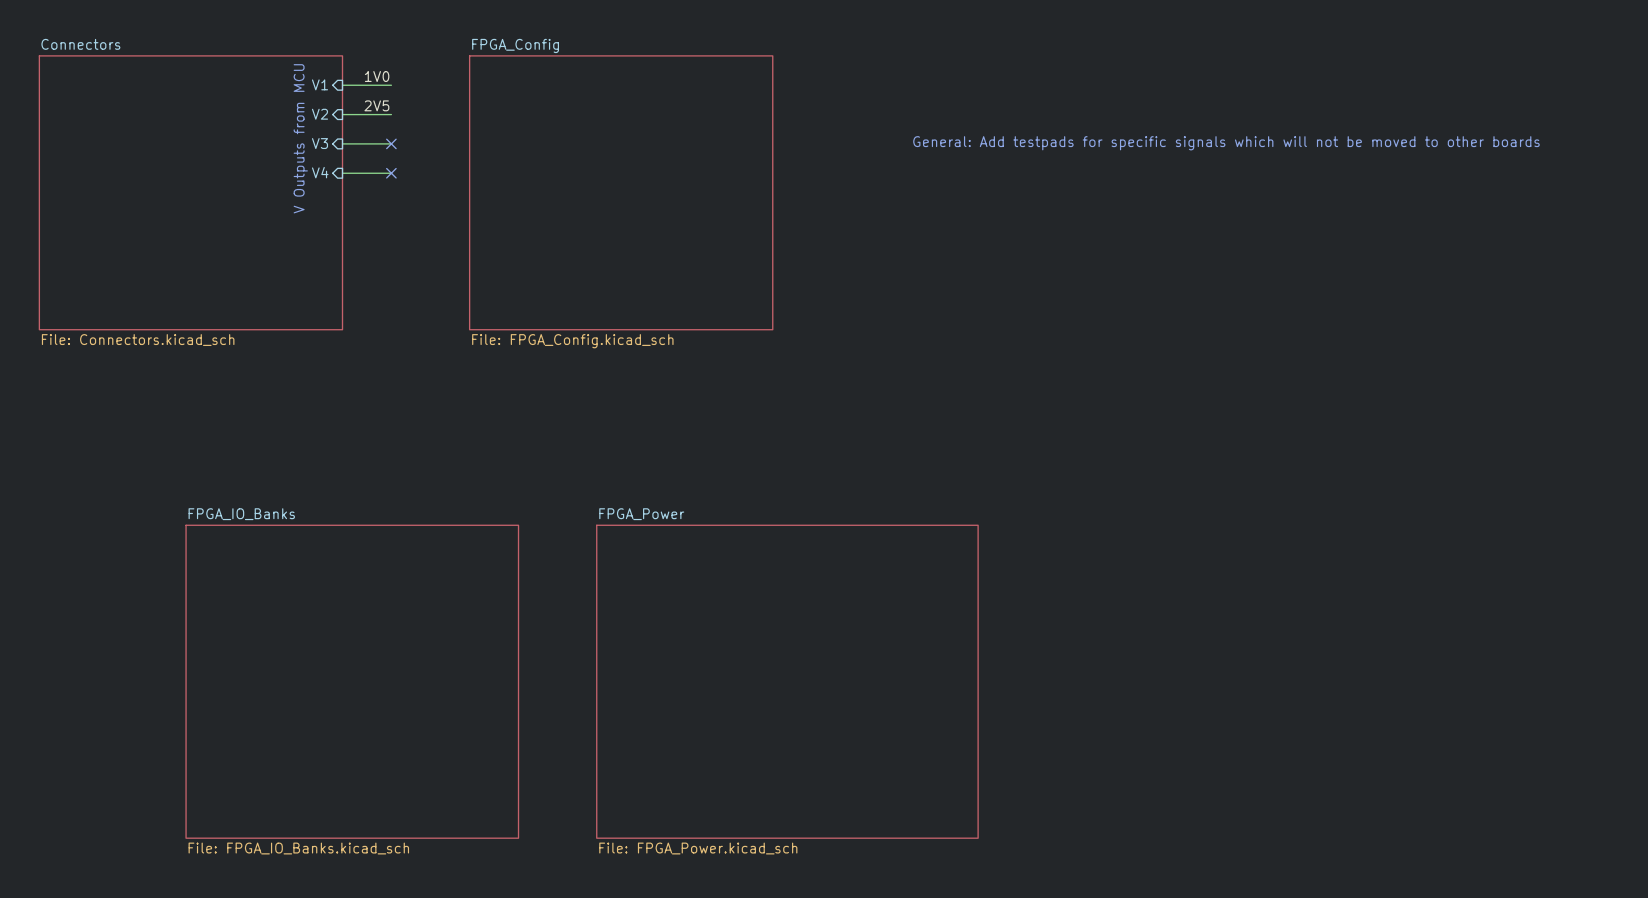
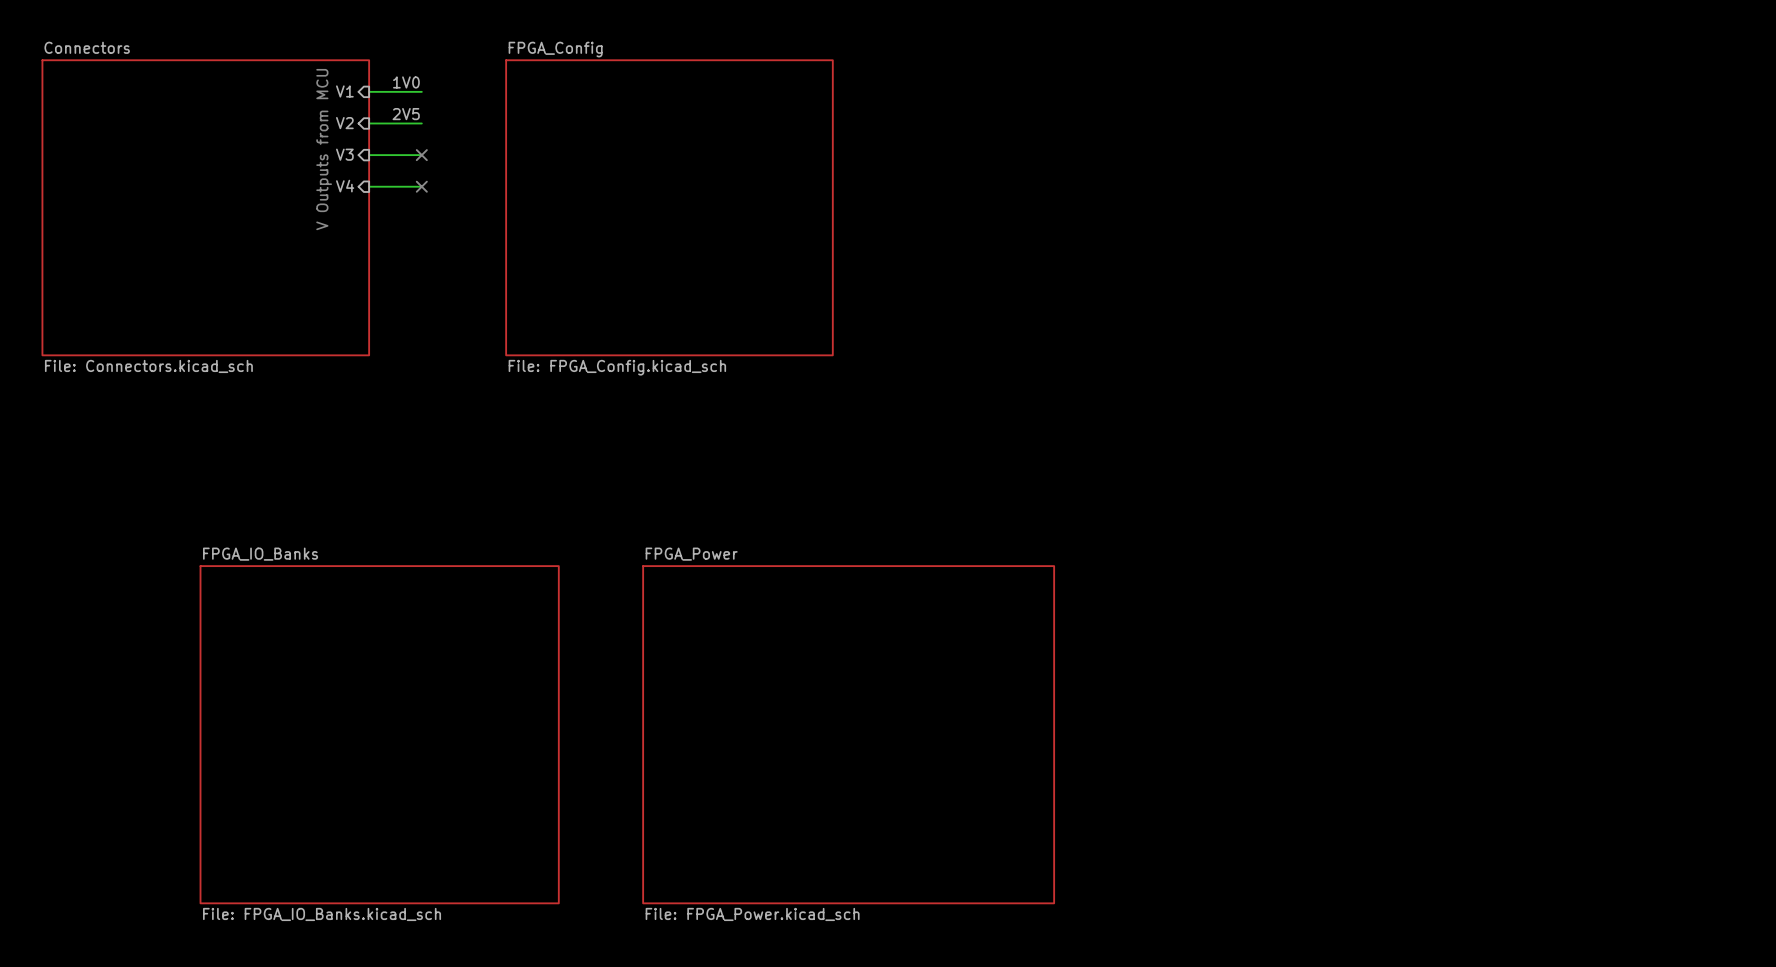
text: General: Add testpads for specific signals which will not be moved to other boards (1226, 143) -> none

